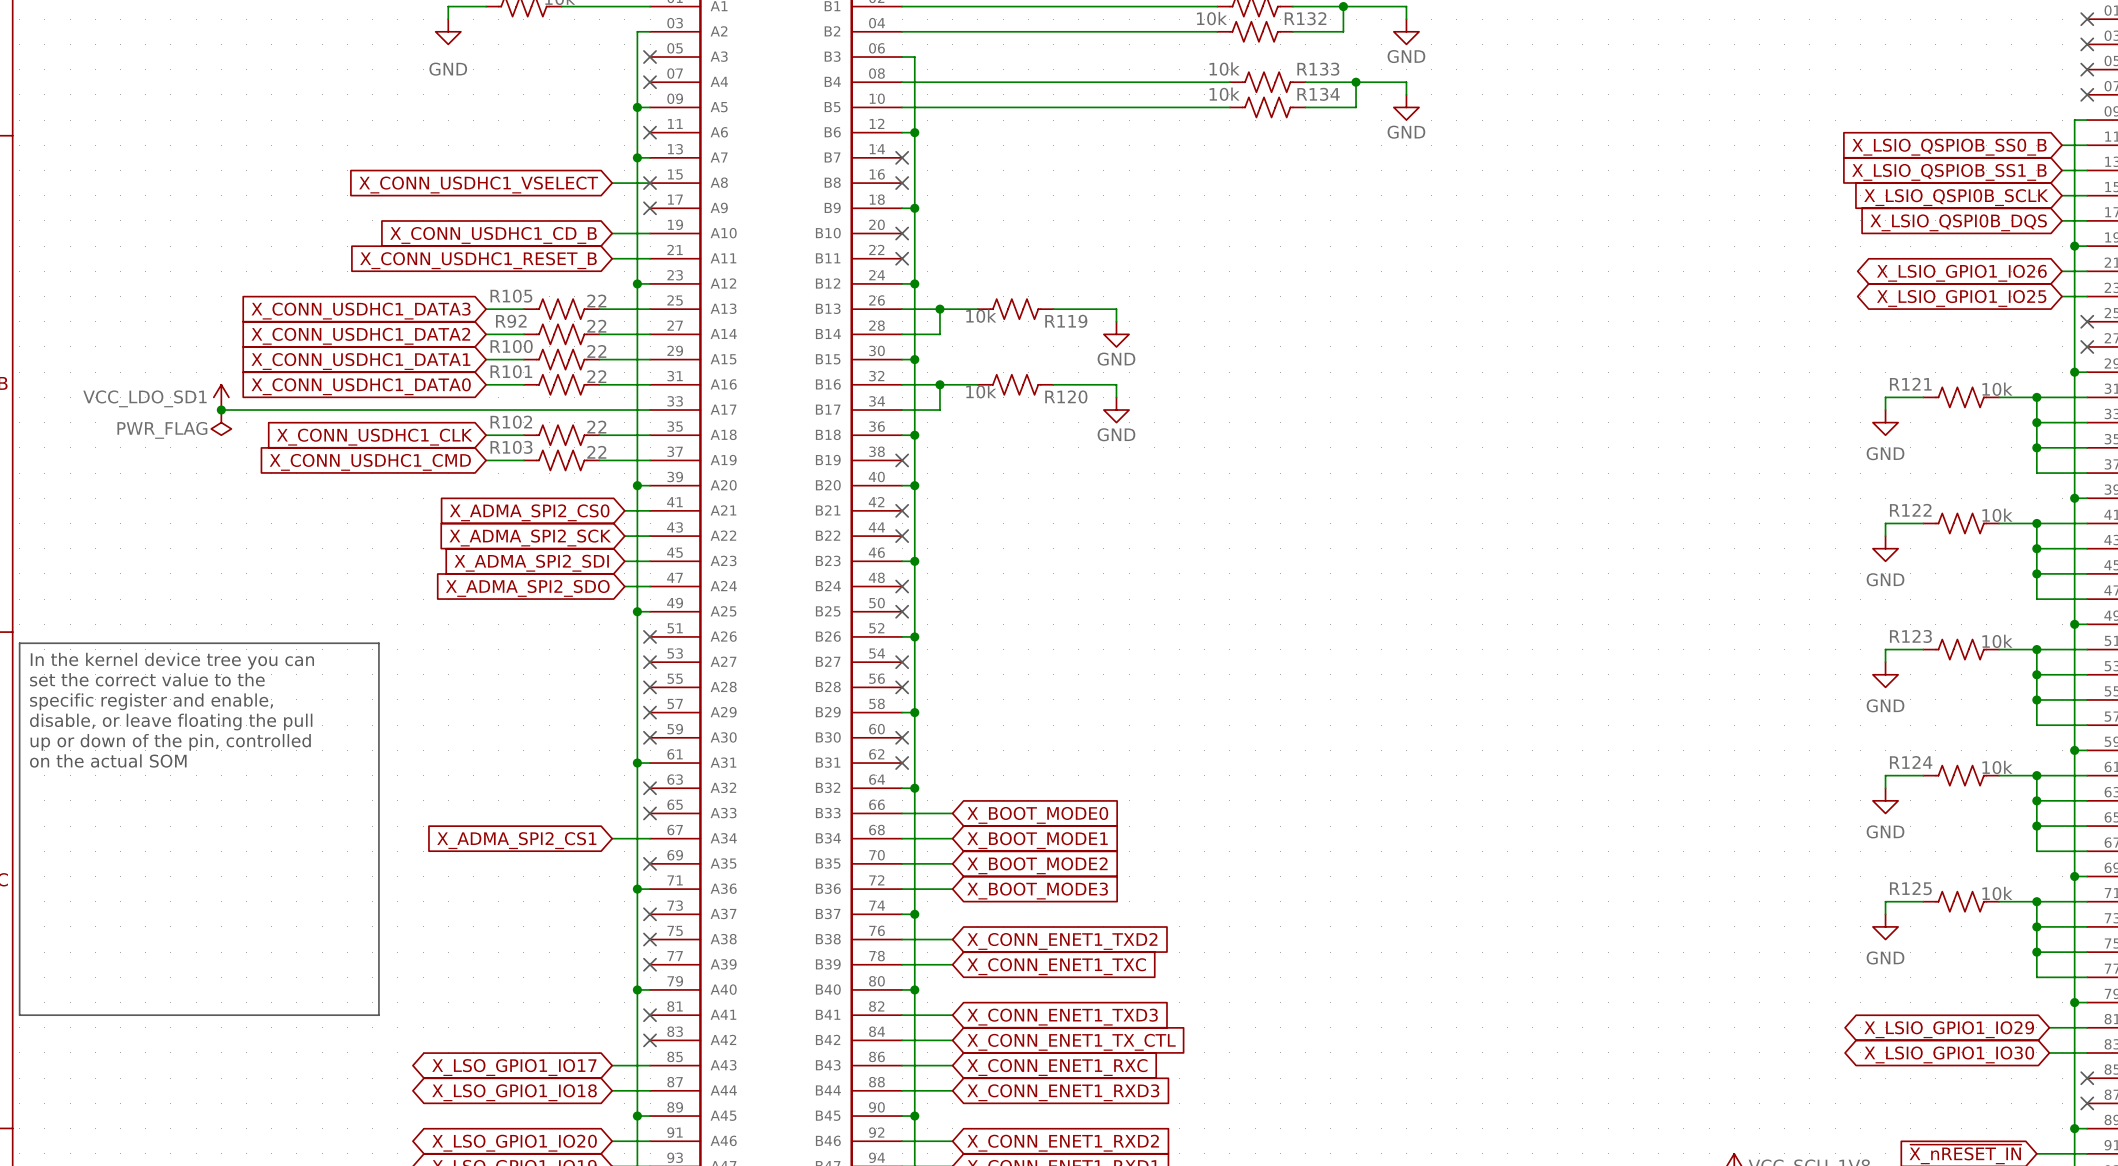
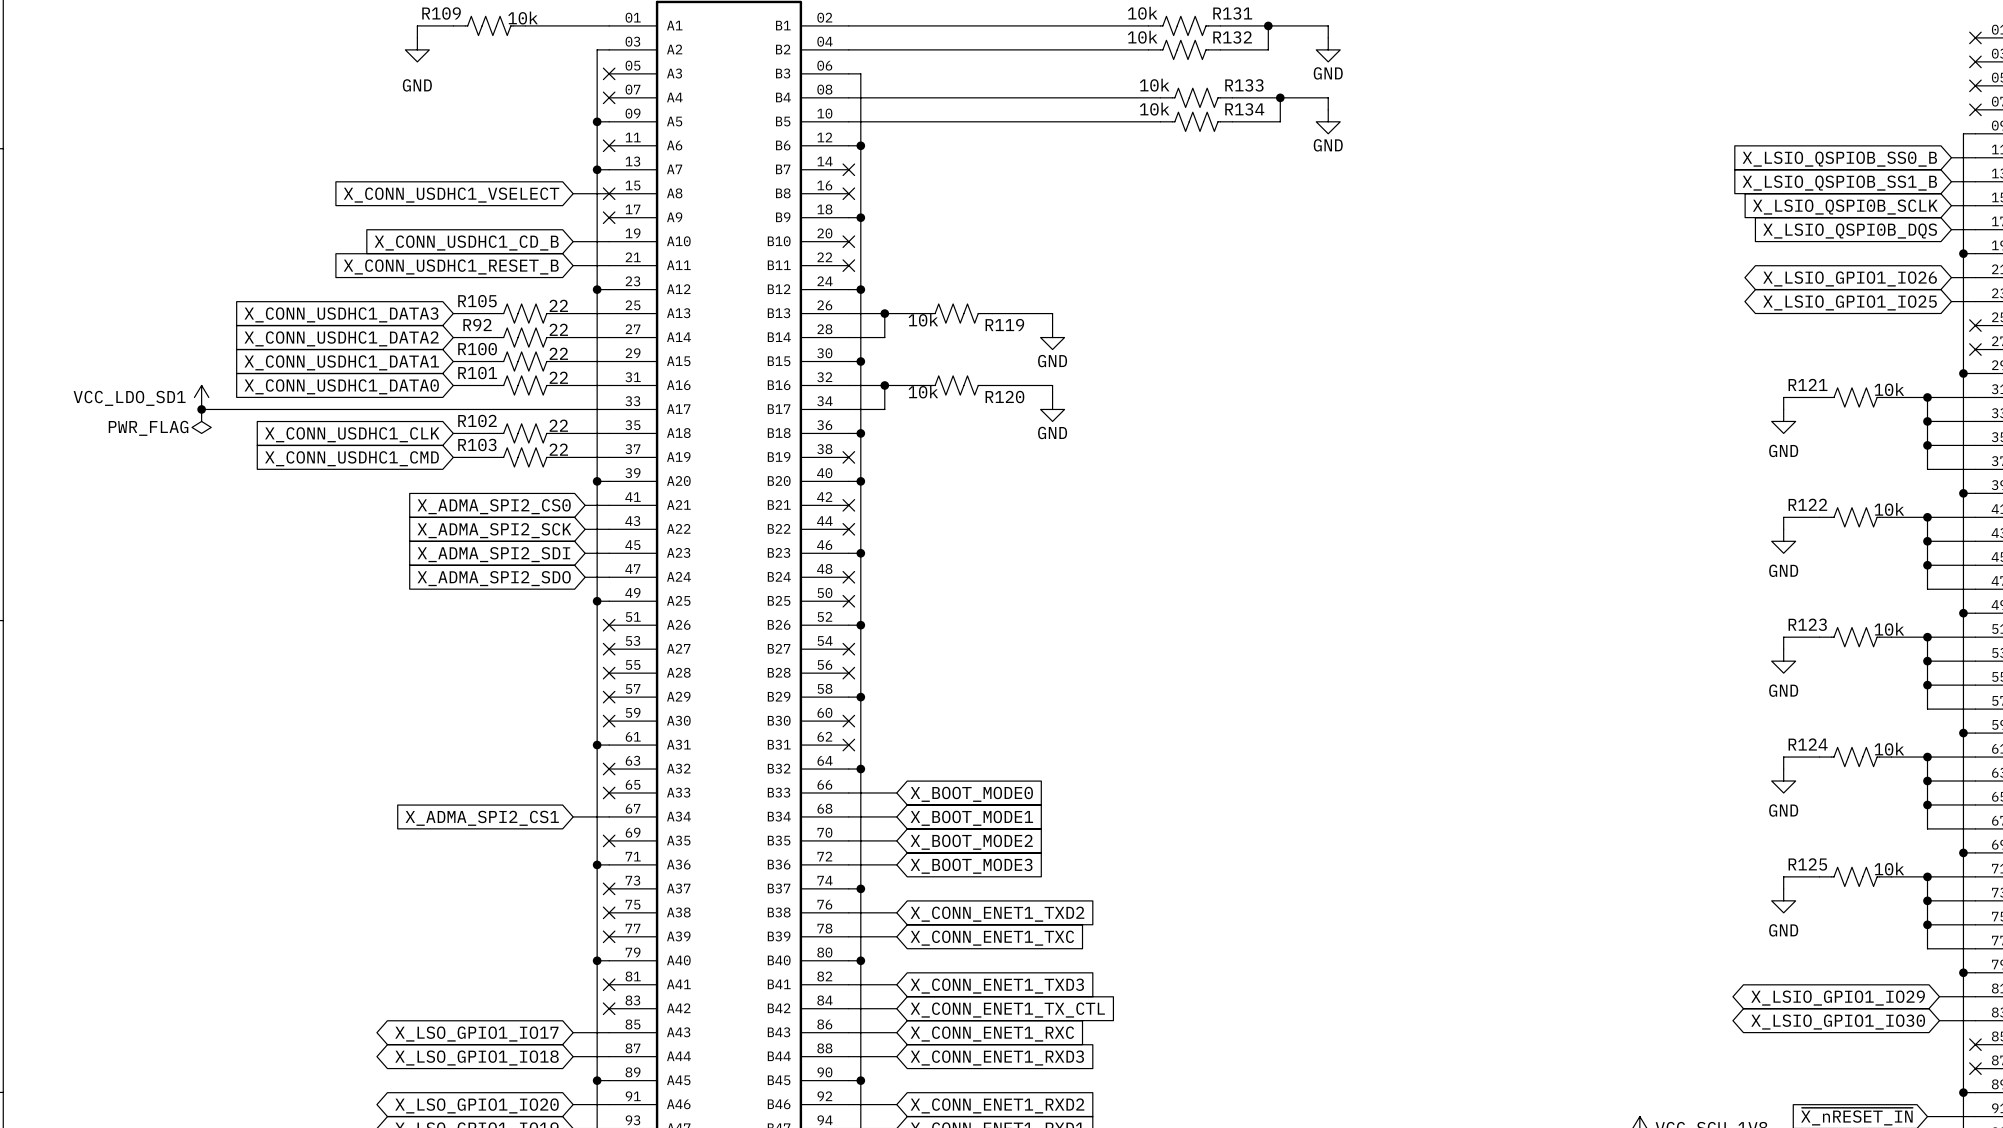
line: (19, 643) (378, 643) (378, 1015) (19, 1015) (19, 643) -> none
text: In the kernel device tree you can (172, 661) -> none
text: set the correct value to the (147, 679) -> none
text: specific register and enable, (151, 701) -> none
text: disable, or leave floating the pull (171, 722) -> none
text: up or down of the pin, controlled (170, 742) -> none
text: on the actual SOM (108, 760) -> none

